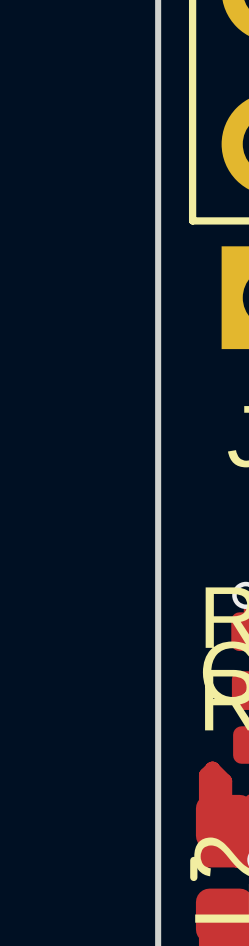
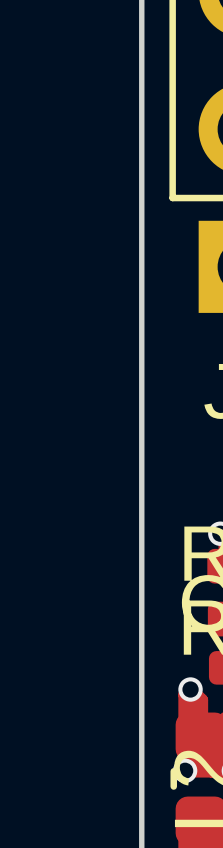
via: none -> (190, 689)
via: none -> (185, 770)

